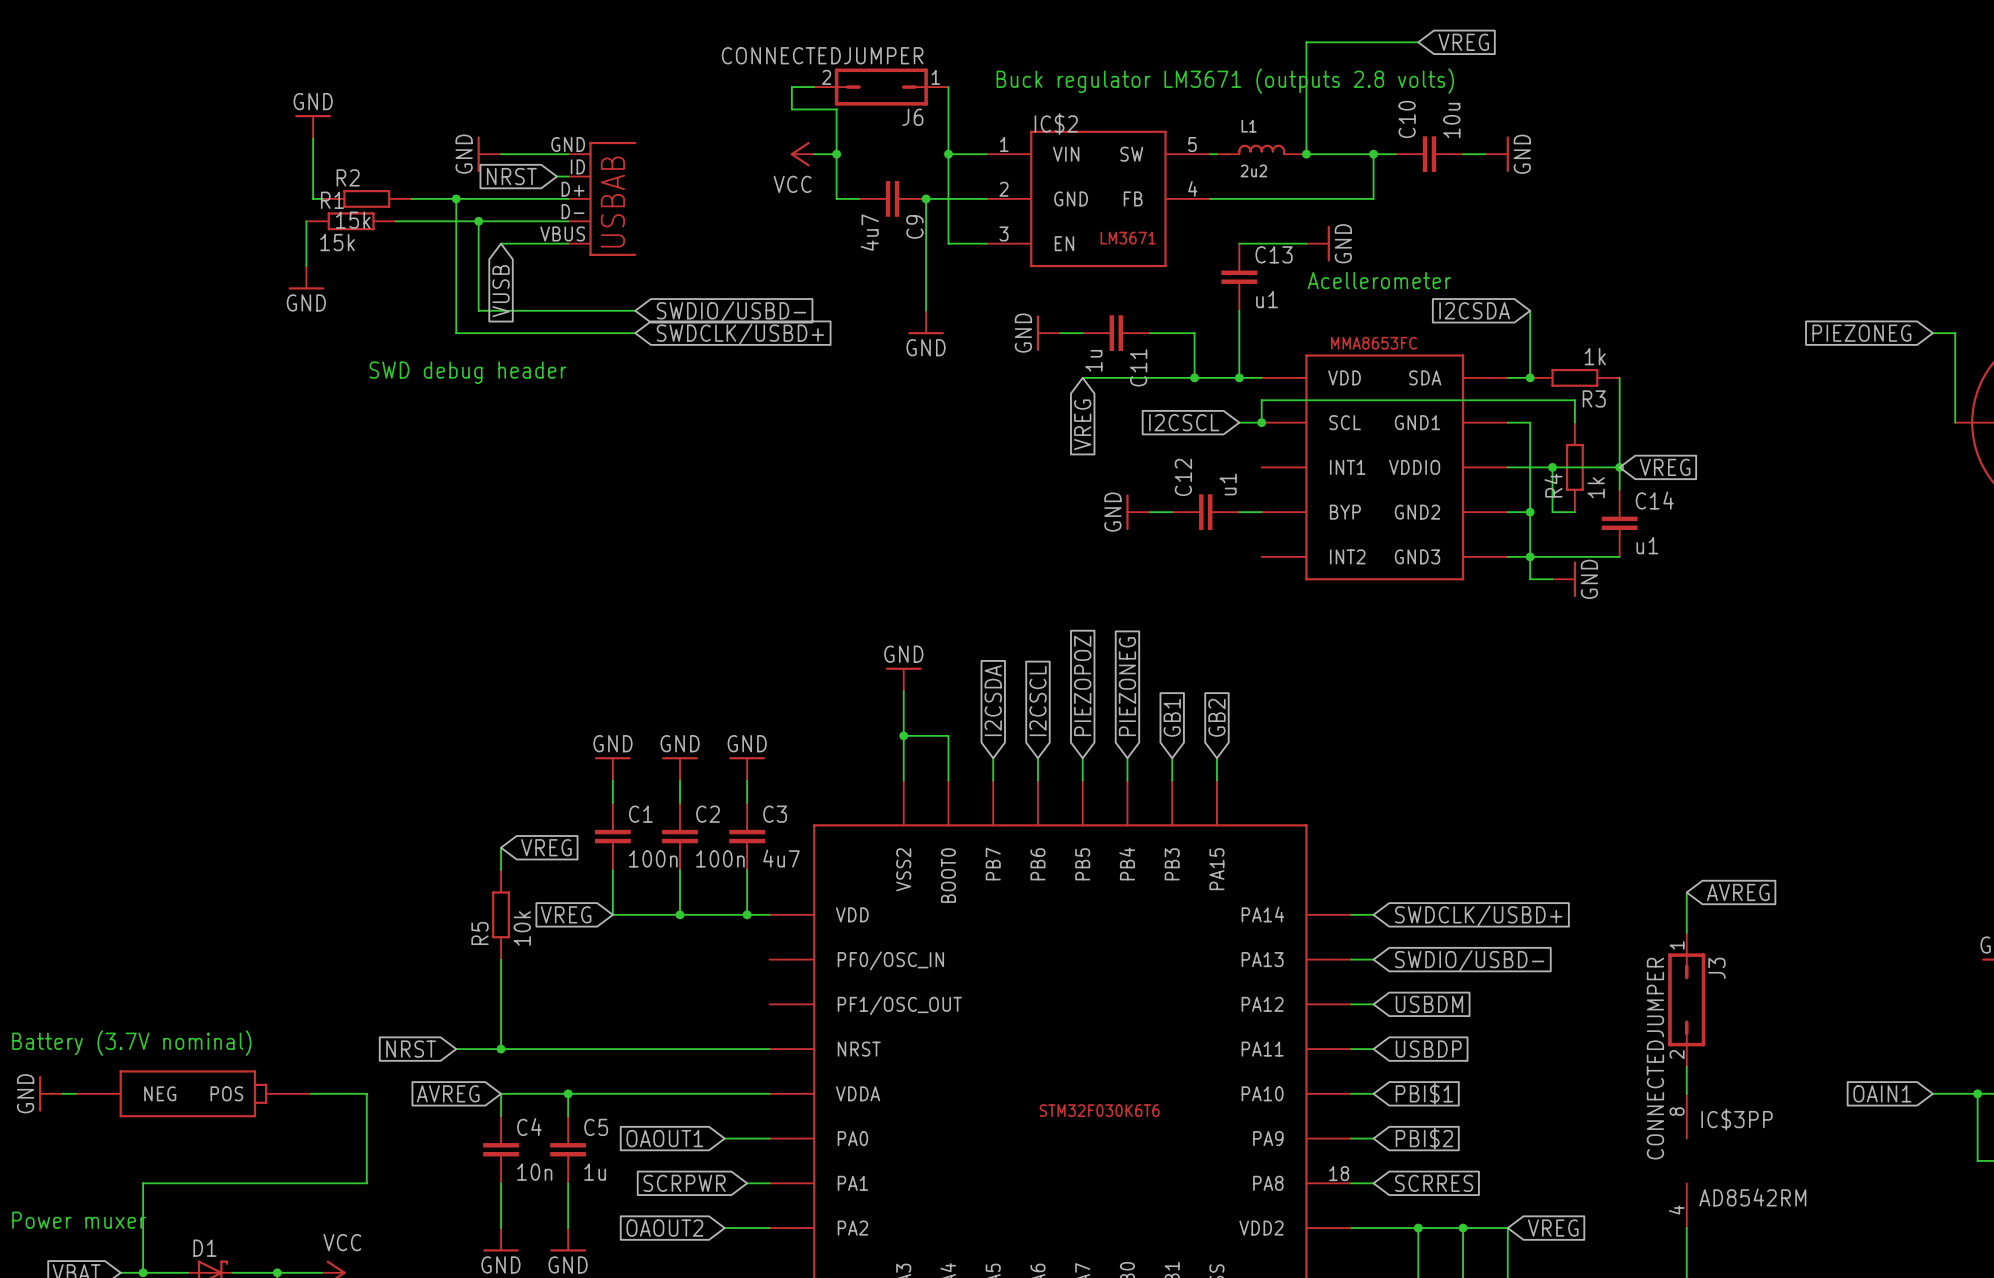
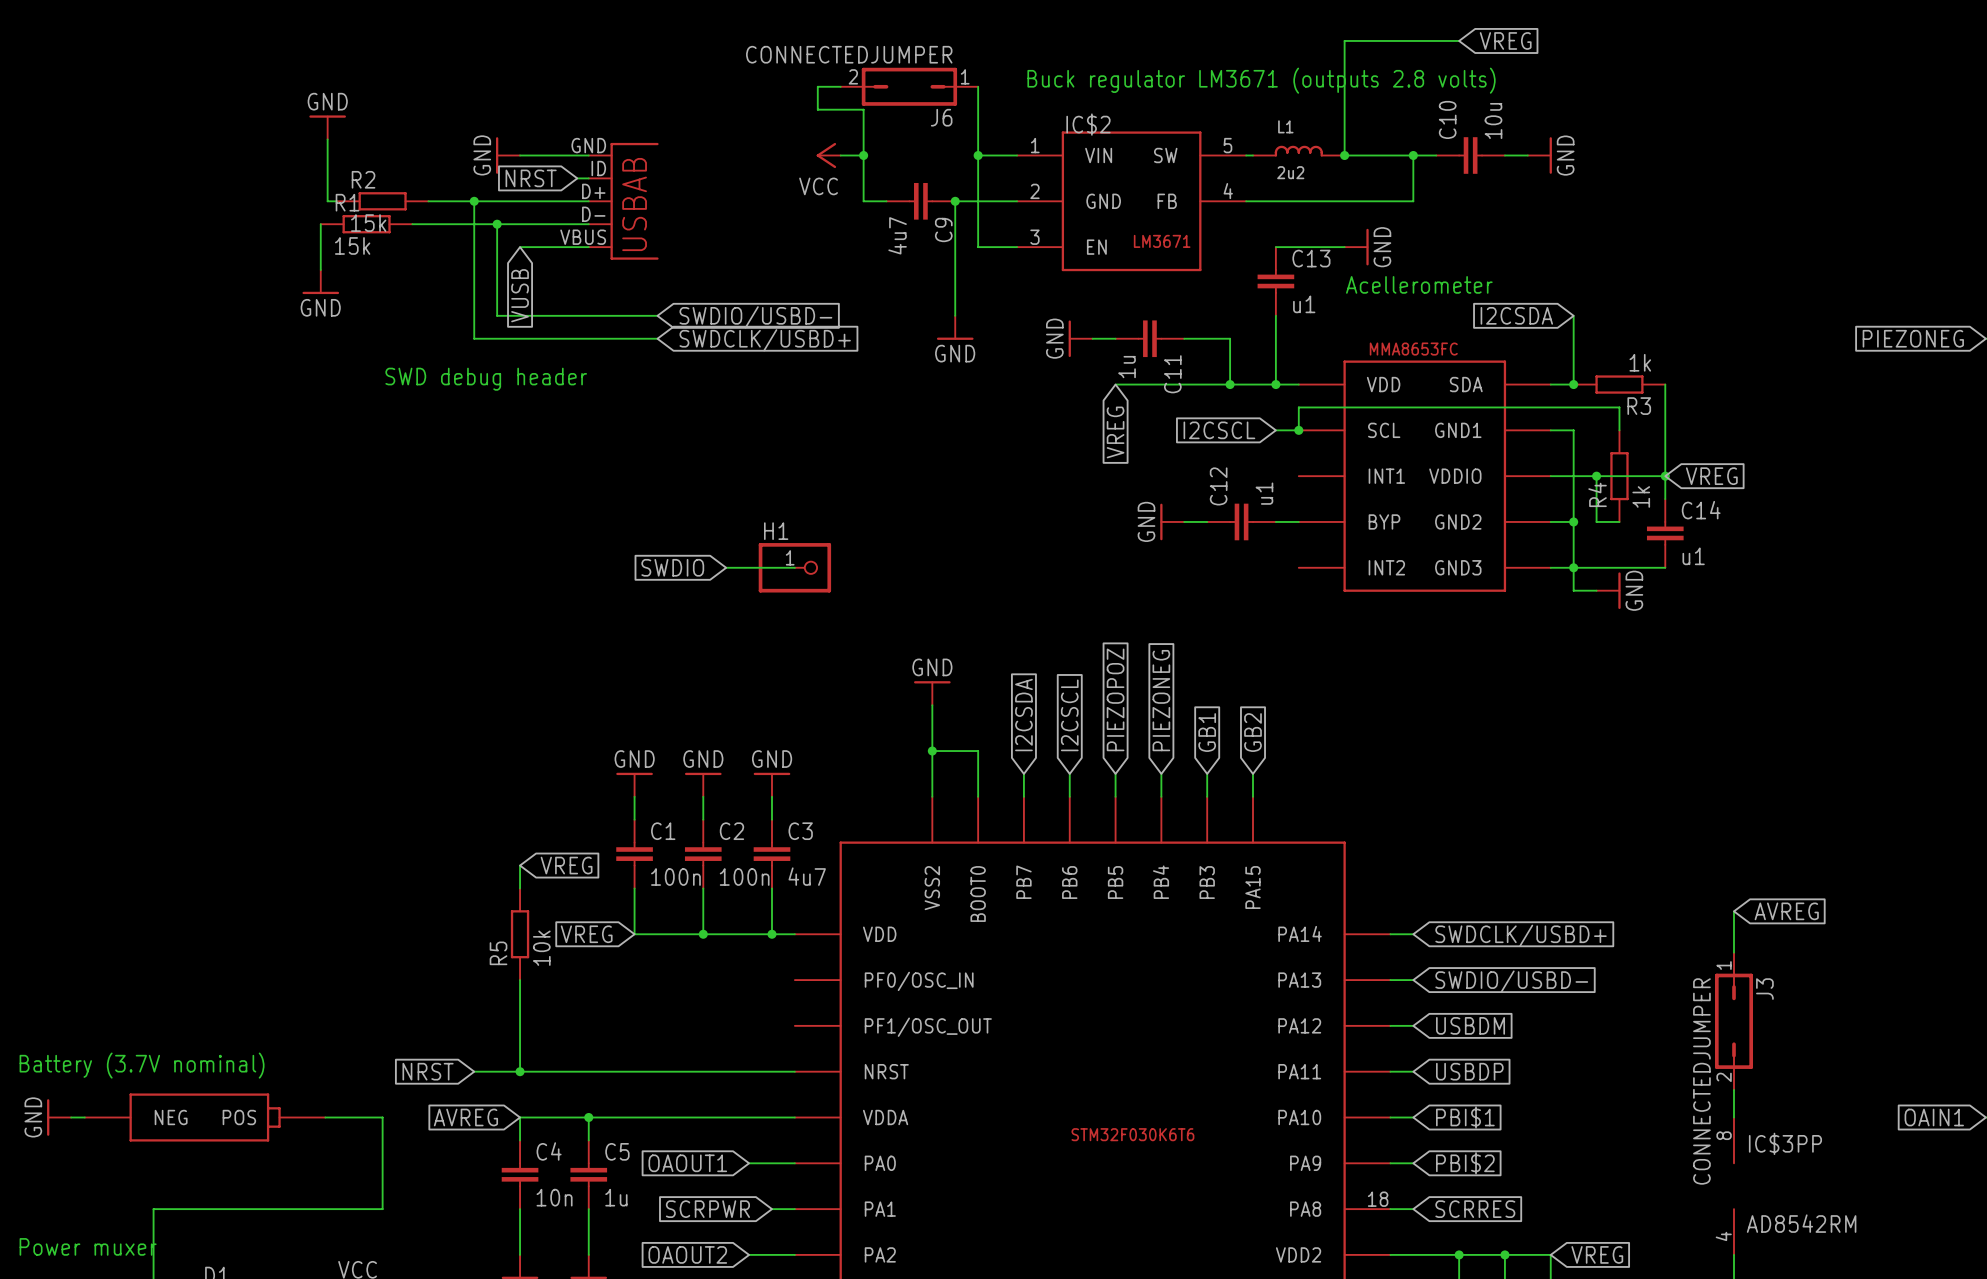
global label: none -> SWDIO (672, 567)
wire: none -> (726, 567) (794, 567)
H1: none -> (794, 567)

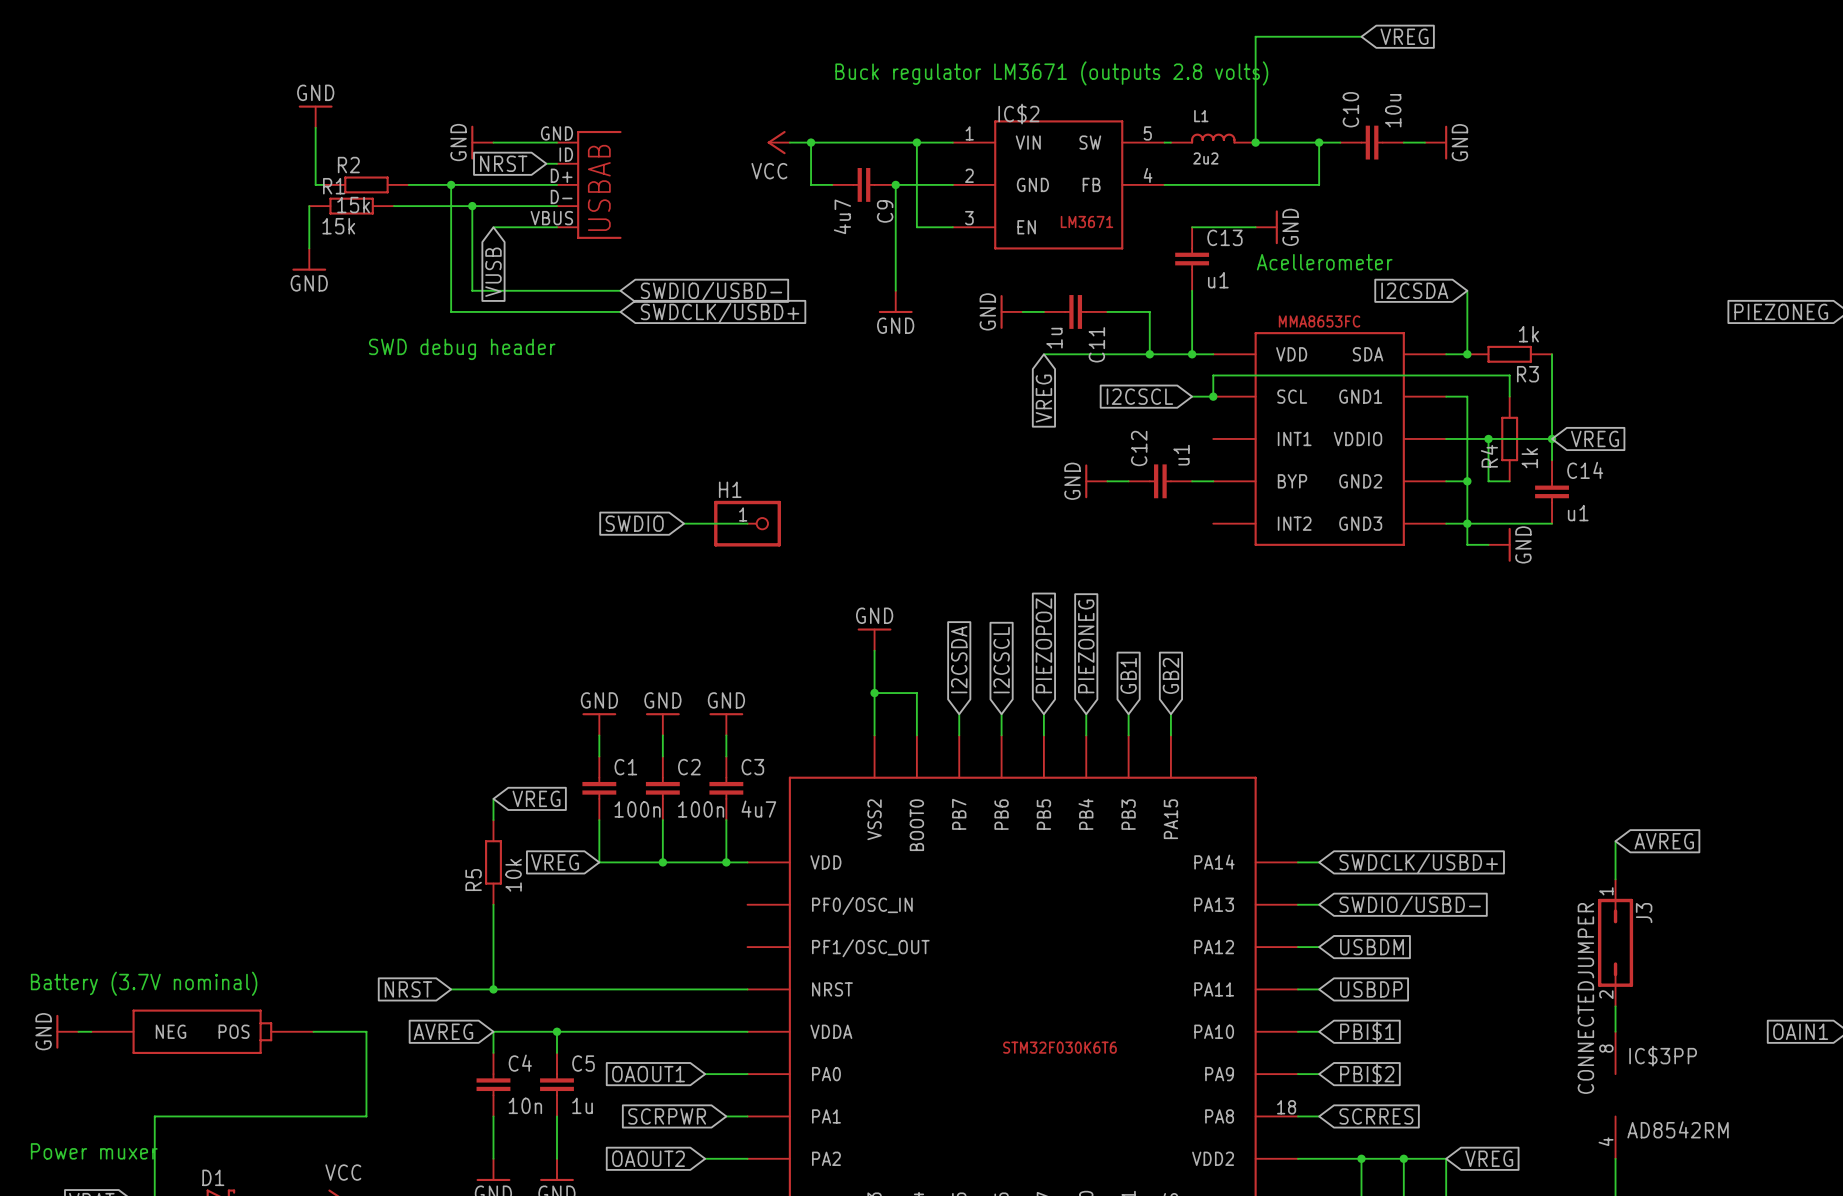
text position: Buck regulator LM3671 (outputs 2.8 volts) (1261, 80) -> Buck regulator LM3671 (outputs 2.8 volts) (1051, 73)
wire: (840, 86) (817, 86) (817, 109) (863, 109) (863, 155) -> none
J6: CONNECTEDJUMPER (909, 86) -> none
wire: (978, 86) (978, 155) -> (811, 142) (916, 142)

